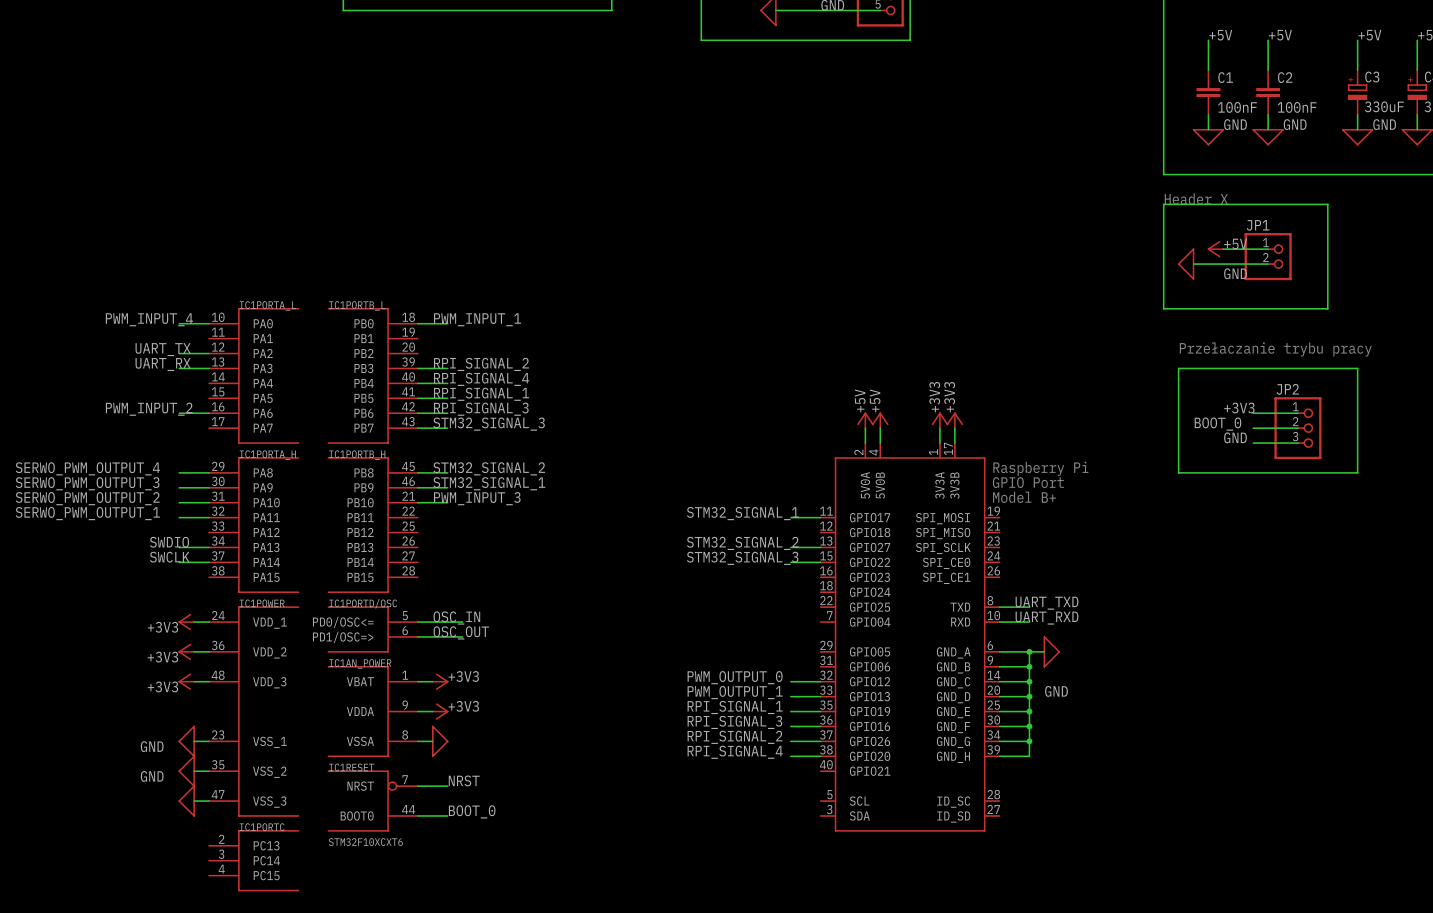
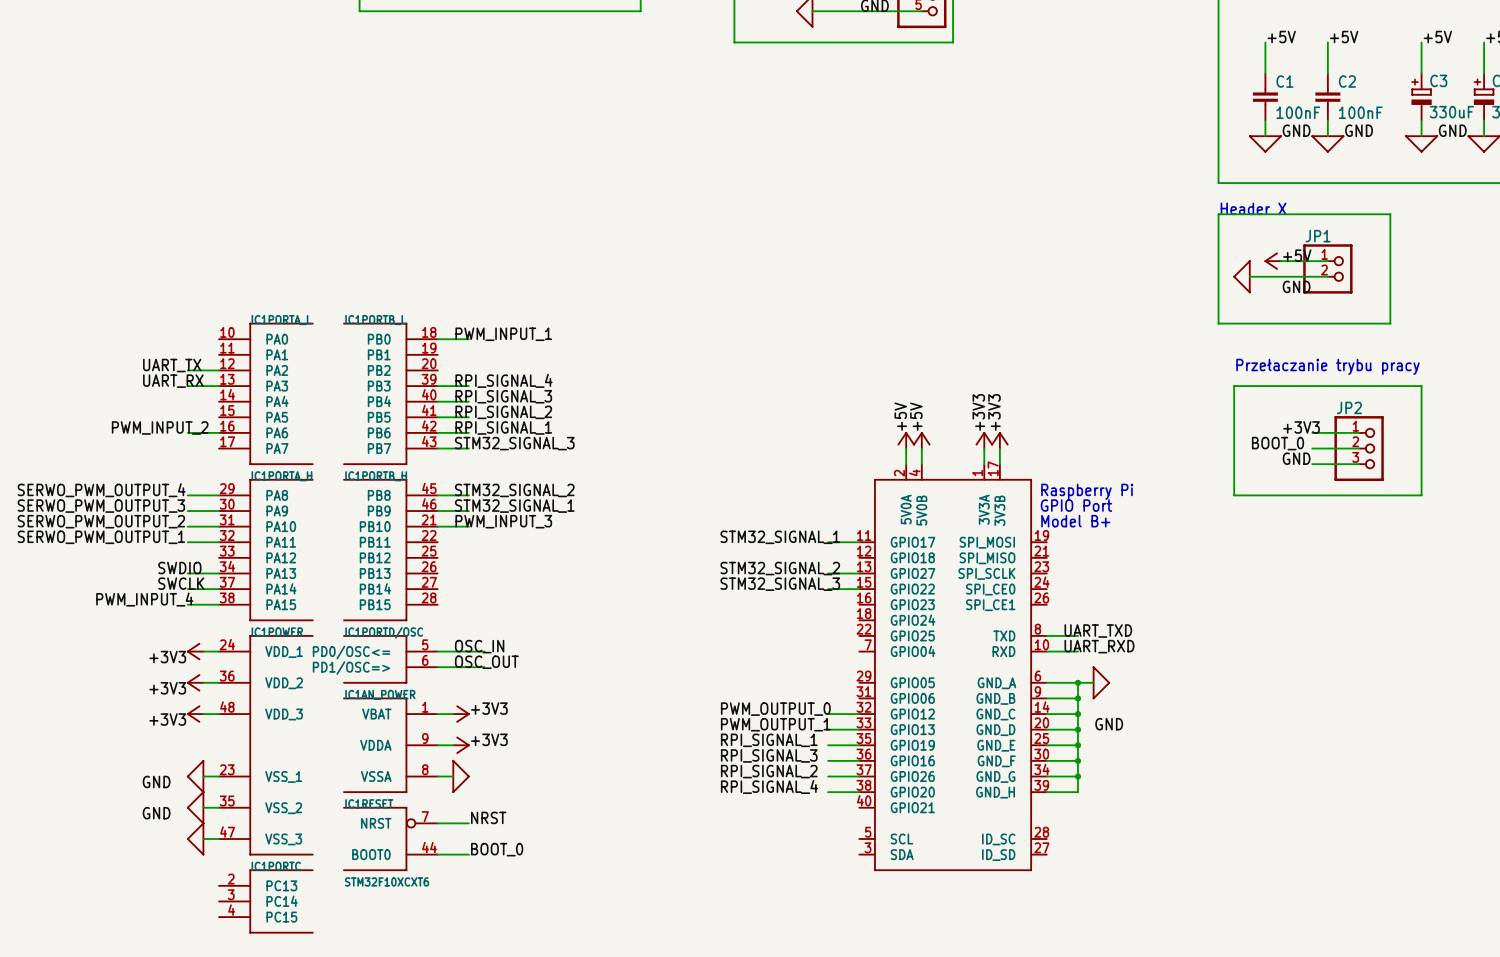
label: PWM_INPUT_4 (149, 319) -> none
wire: (179, 323) (209, 323) -> none
label: RPI_SIGNAL_2 (481, 364) -> RPI_SIGNAL_4 (503, 380)
label: RPI_SIGNAL_4 (481, 379) -> RPI_SIGNAL_3 (503, 396)
label: RPI_SIGNAL_1 (481, 394) -> RPI_SIGNAL_2 (503, 412)
label: RPI_SIGNAL_3 (481, 409) -> RPI_SIGNAL_1 (503, 427)
label: none -> PWM_INPUT_4 (144, 599)
wire: none -> (187, 604) (219, 604)

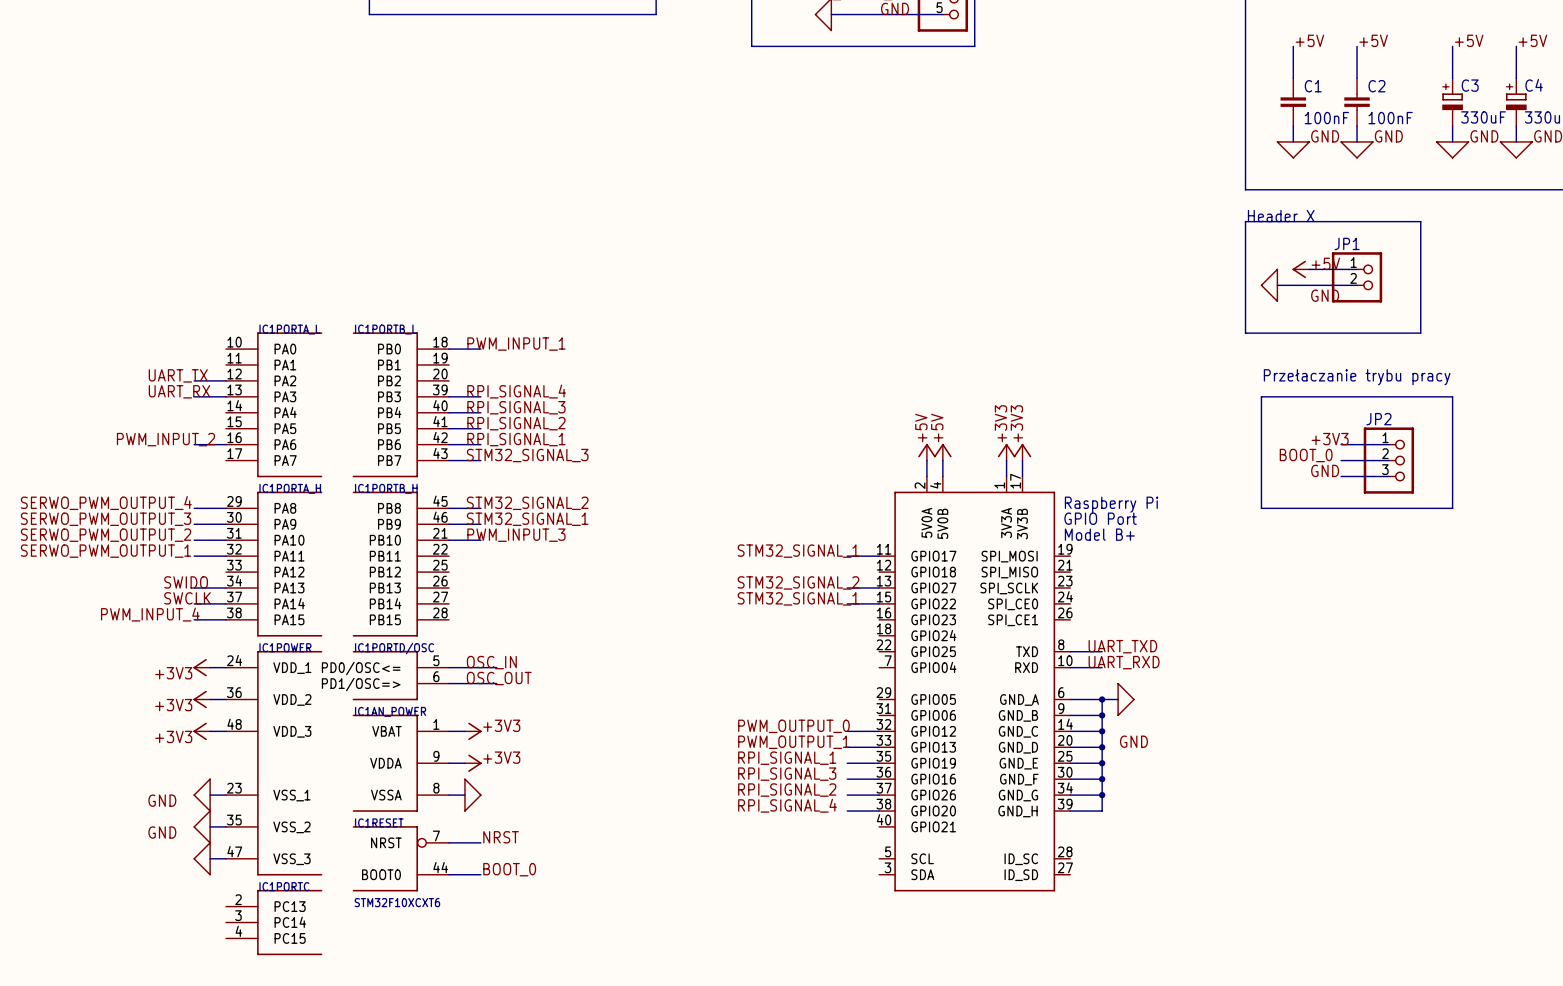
label: SWDIO (179, 568) -> SWIDO (186, 582)
label: STM32_SIGNAL_3 (780, 584) -> STM32_SIGNAL_1 (798, 598)

